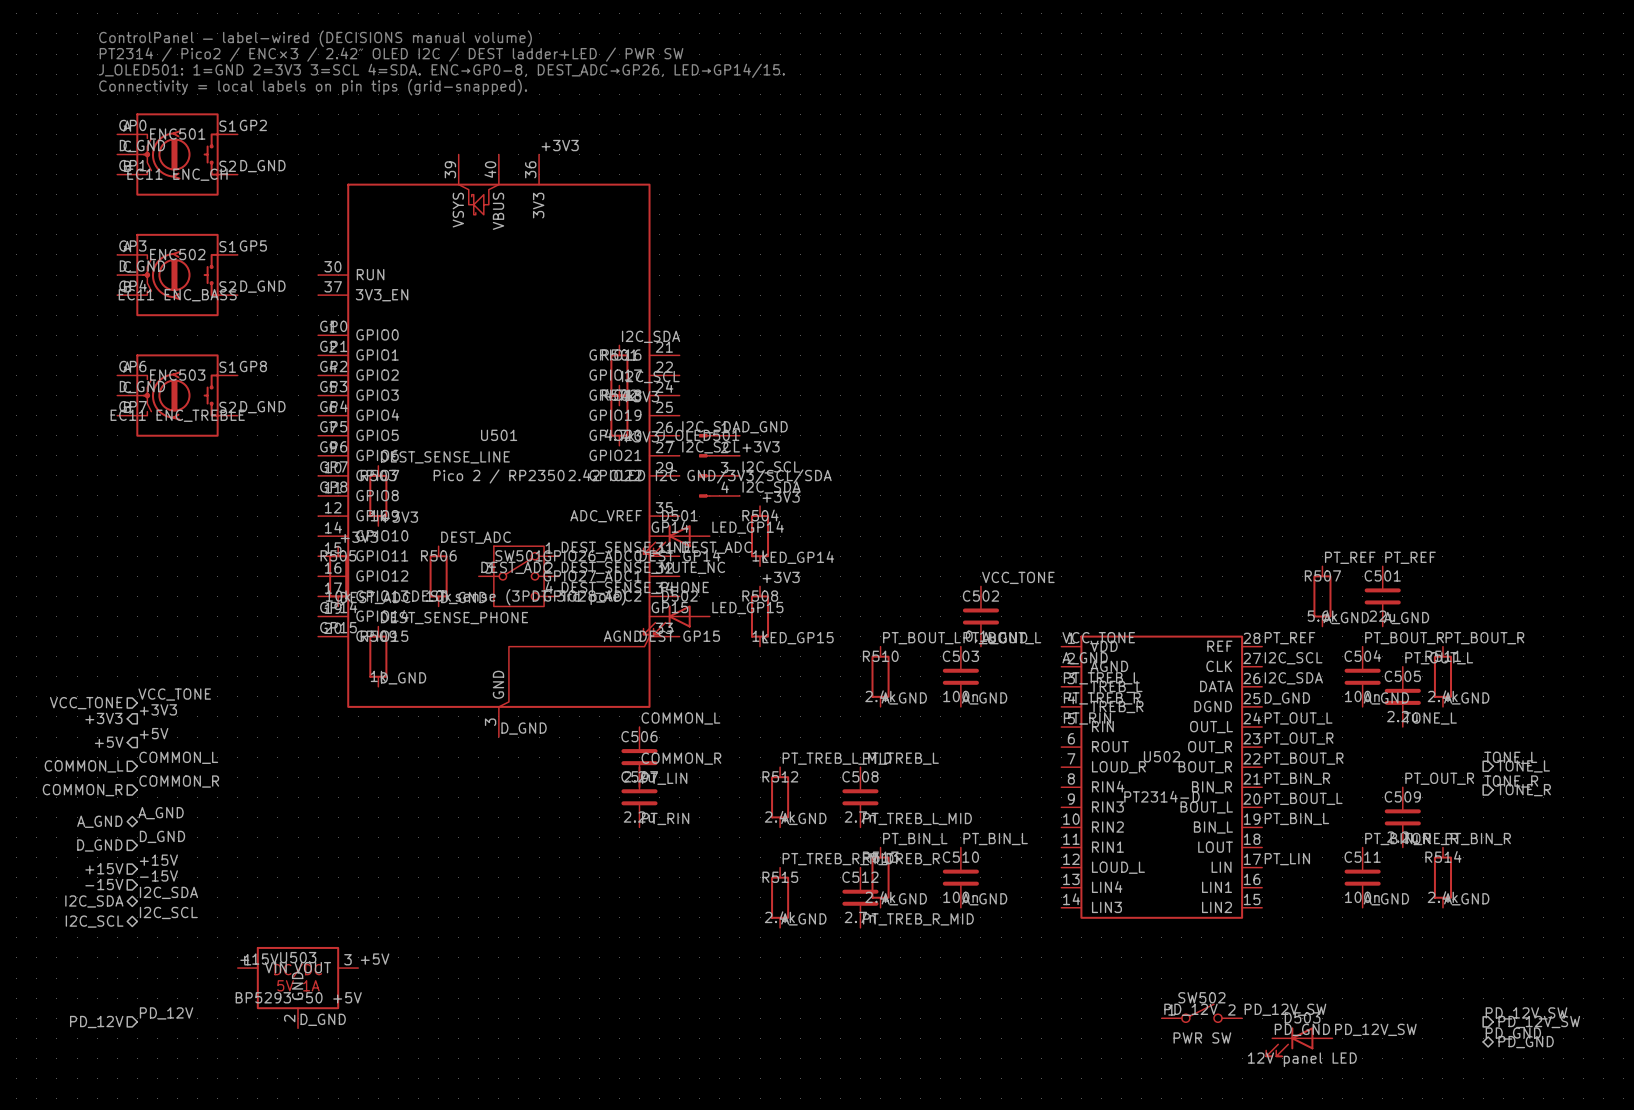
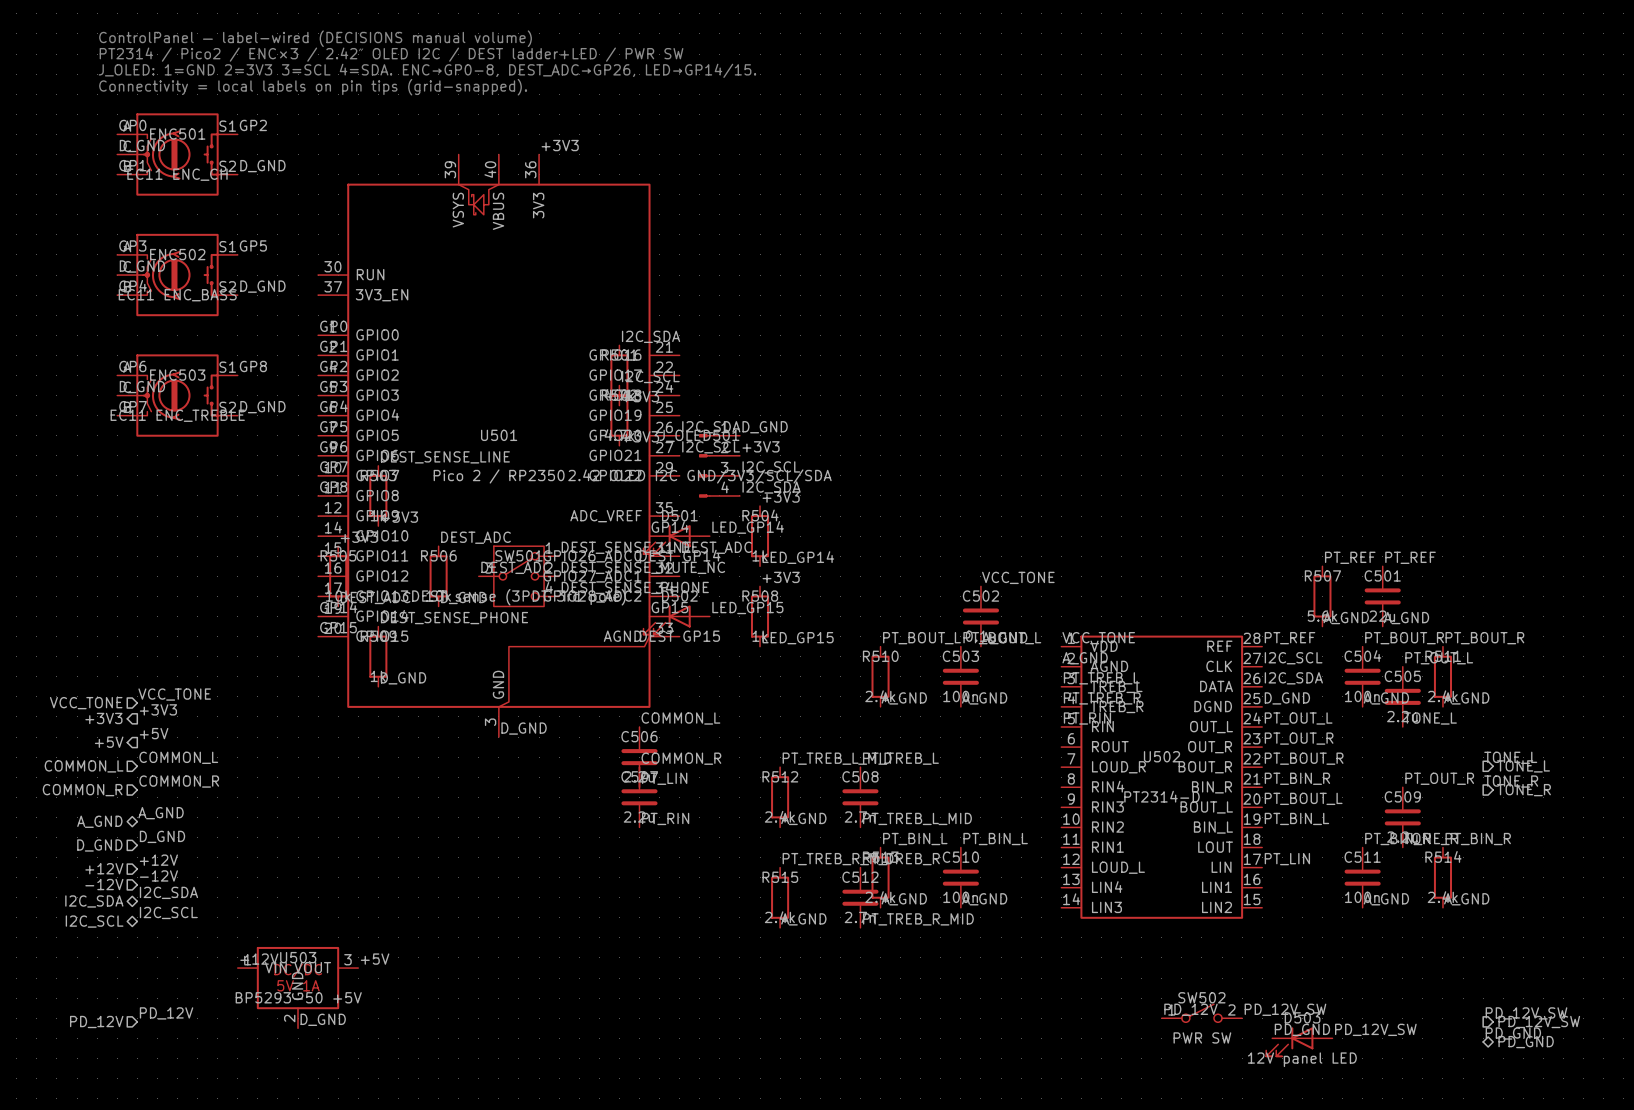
text: J_OLED501: 1=GND 2=3V3 3=SCL 4=SDA. ENC→GP0-8, DEST_ADC→GP26, LED→GP14/15. (441, 70) -> J_OLED: 1=GND 2=3V3 3=SCL 4=SDA. ENC→GP0-8, DEST_ADC→GP26, LED→GP14/15. (427, 70)
label: +15V (158, 860) -> +12V (158, 860)
hierarchical label: +15V (104, 868) -> +12V (104, 868)
label: -15V (158, 875) -> -12V (158, 875)
hierarchical label: -15V (104, 884) -> -12V (104, 884)
label: +15V (259, 959) -> +12V (259, 959)

